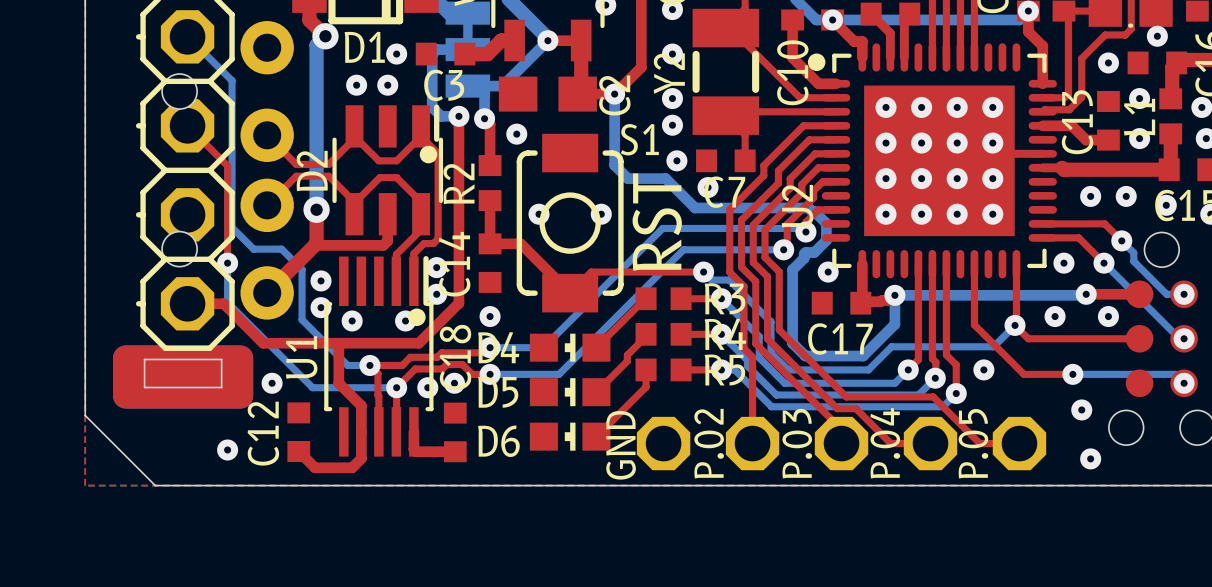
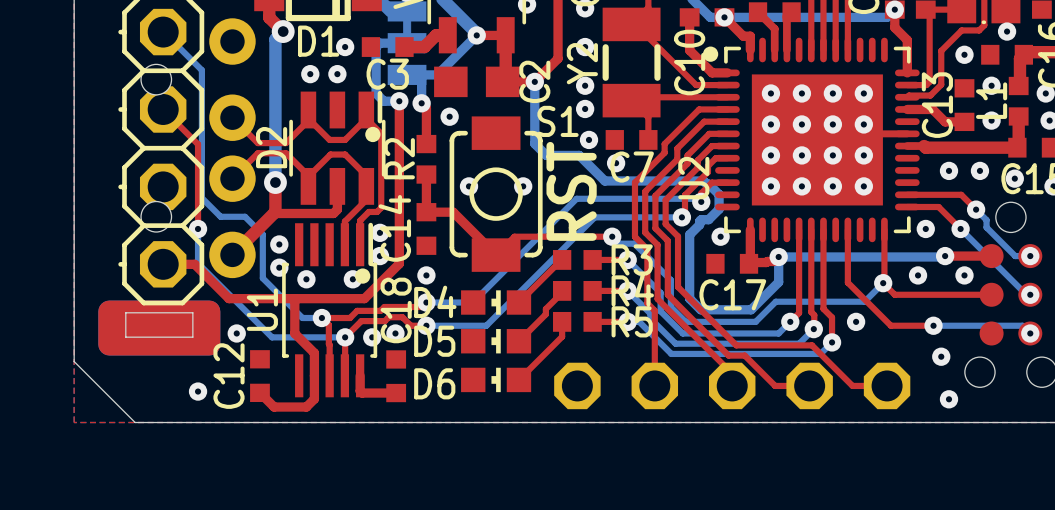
text: P.02 (709, 443) -> none
text: P.03 (797, 443) -> none
text: P.04 (885, 443) -> none
text: P.05 (973, 443) -> none
text: GND (621, 445) -> none

